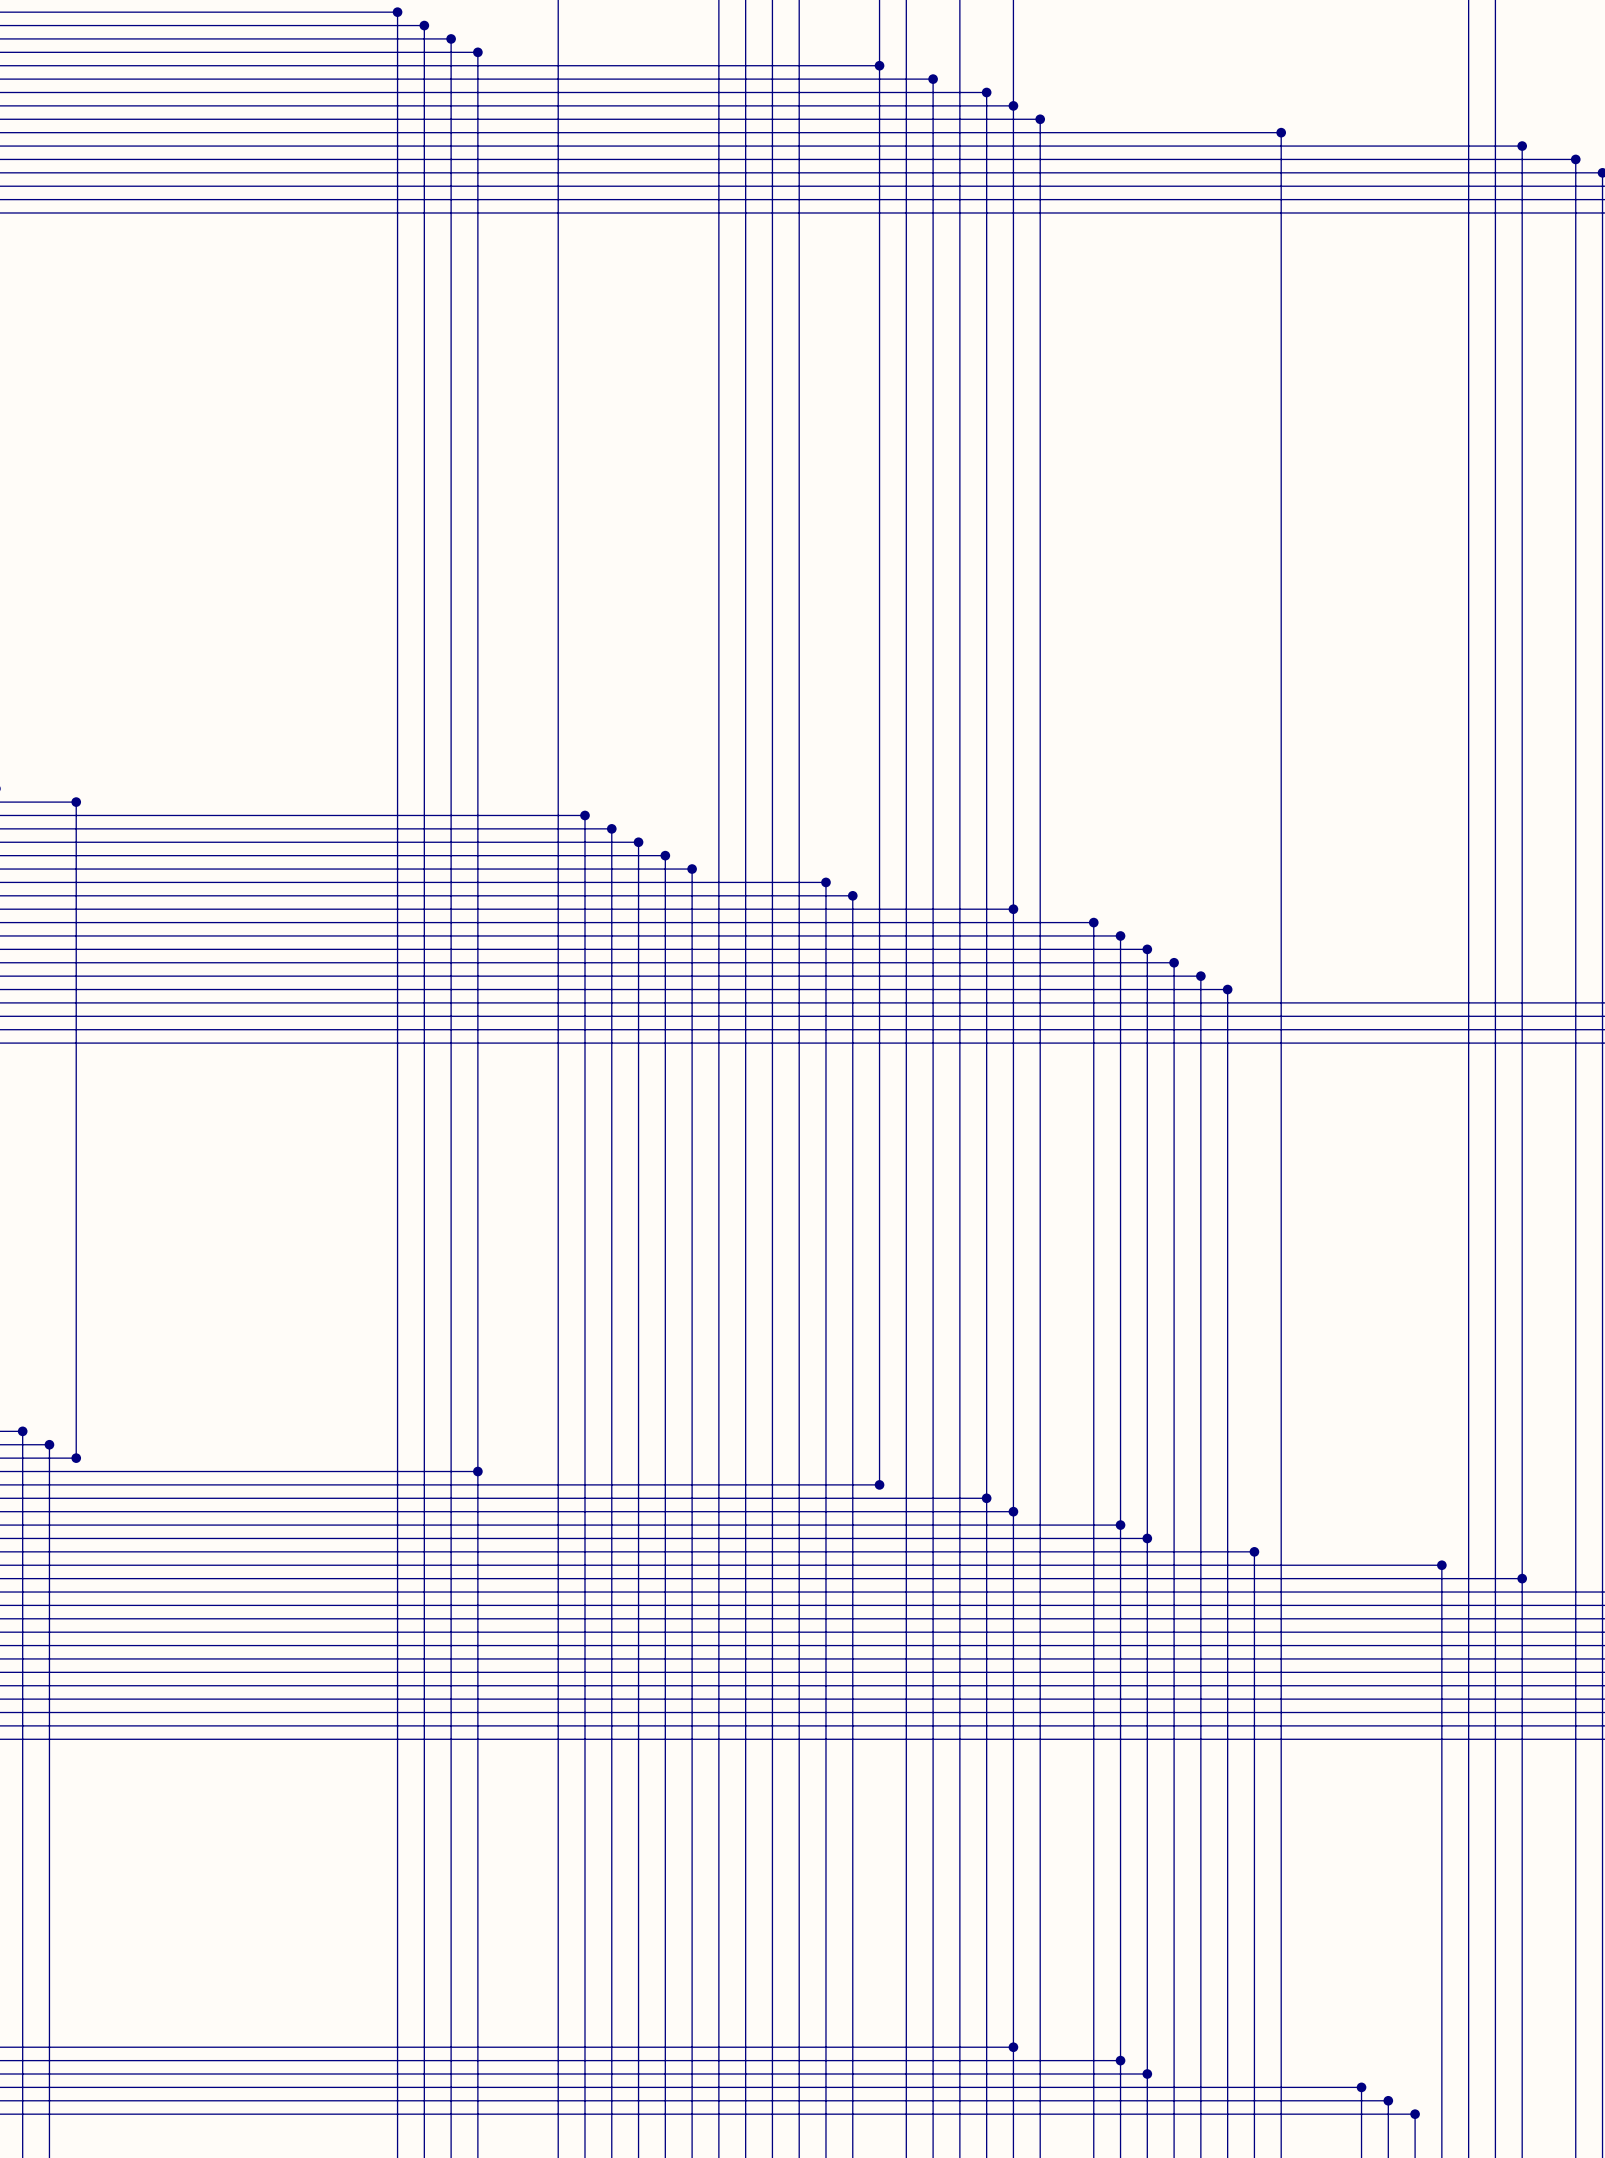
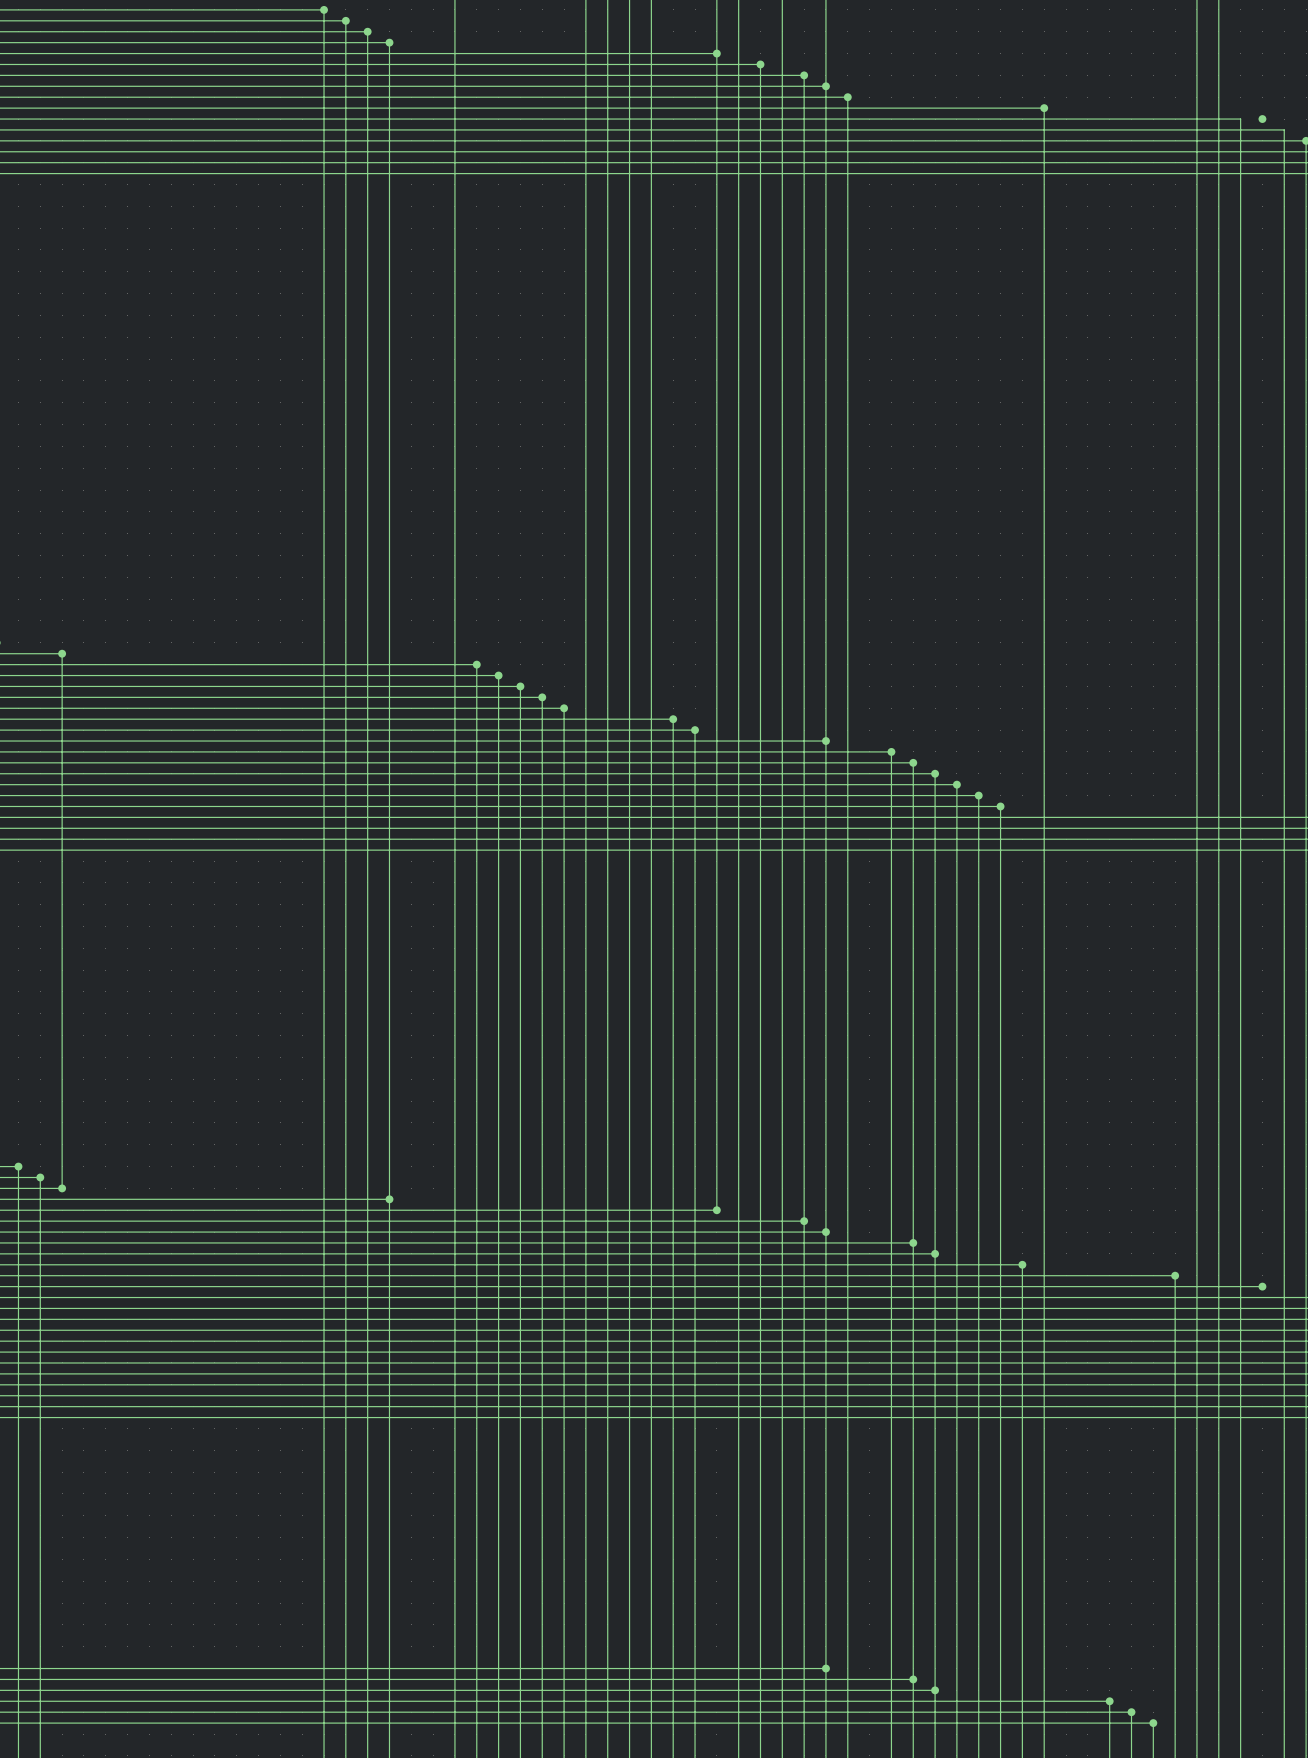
junction: (1522, 146) -> none
junction: none -> (1262, 119)
junction: (1575, 159) -> none
wire: none -> (1240, 1286) (1262, 1286)
junction position: (1522, 1578) -> (1262, 1286)

